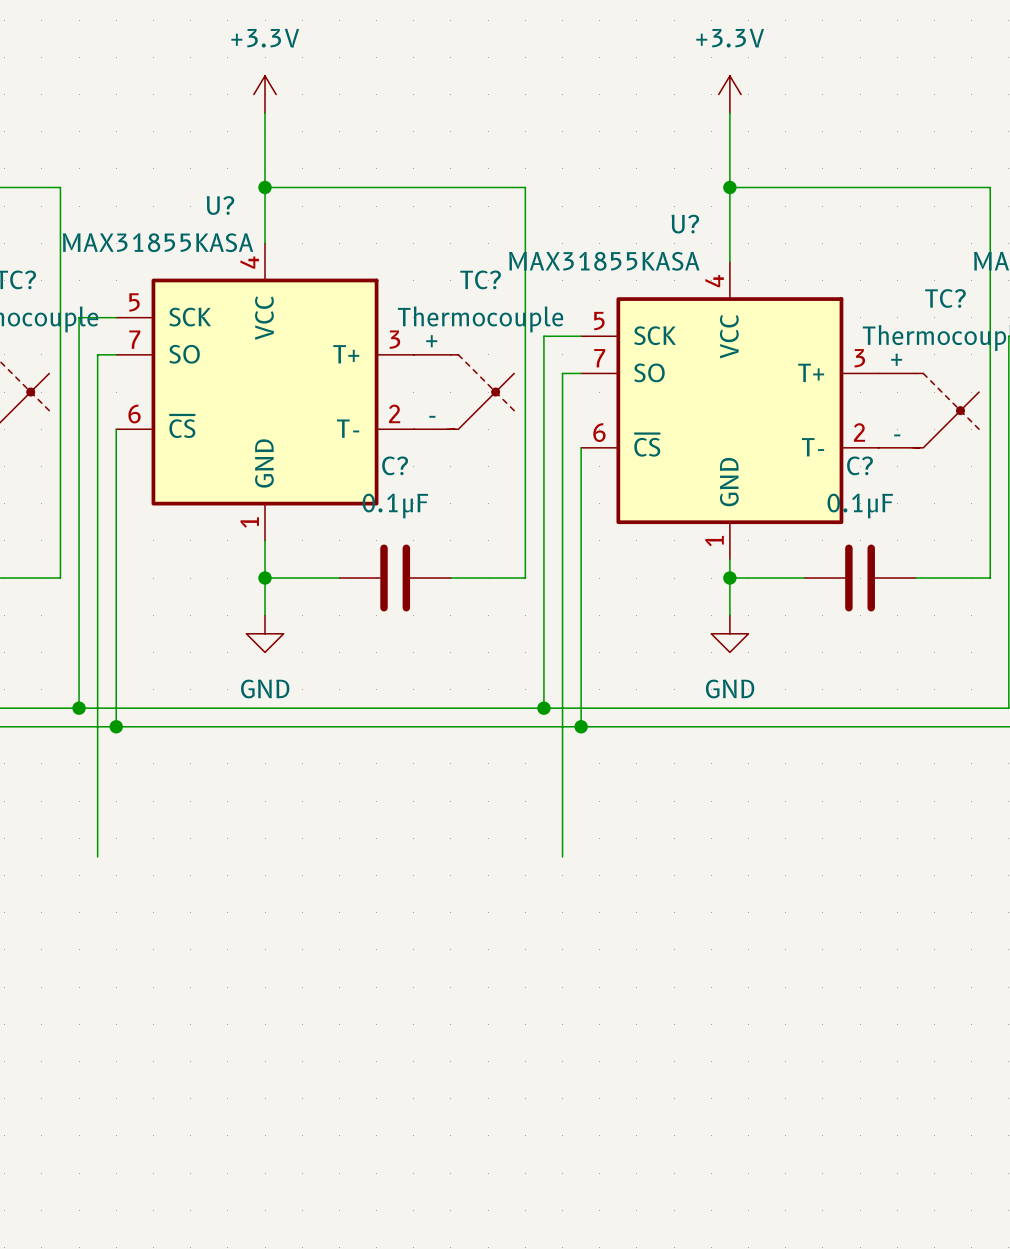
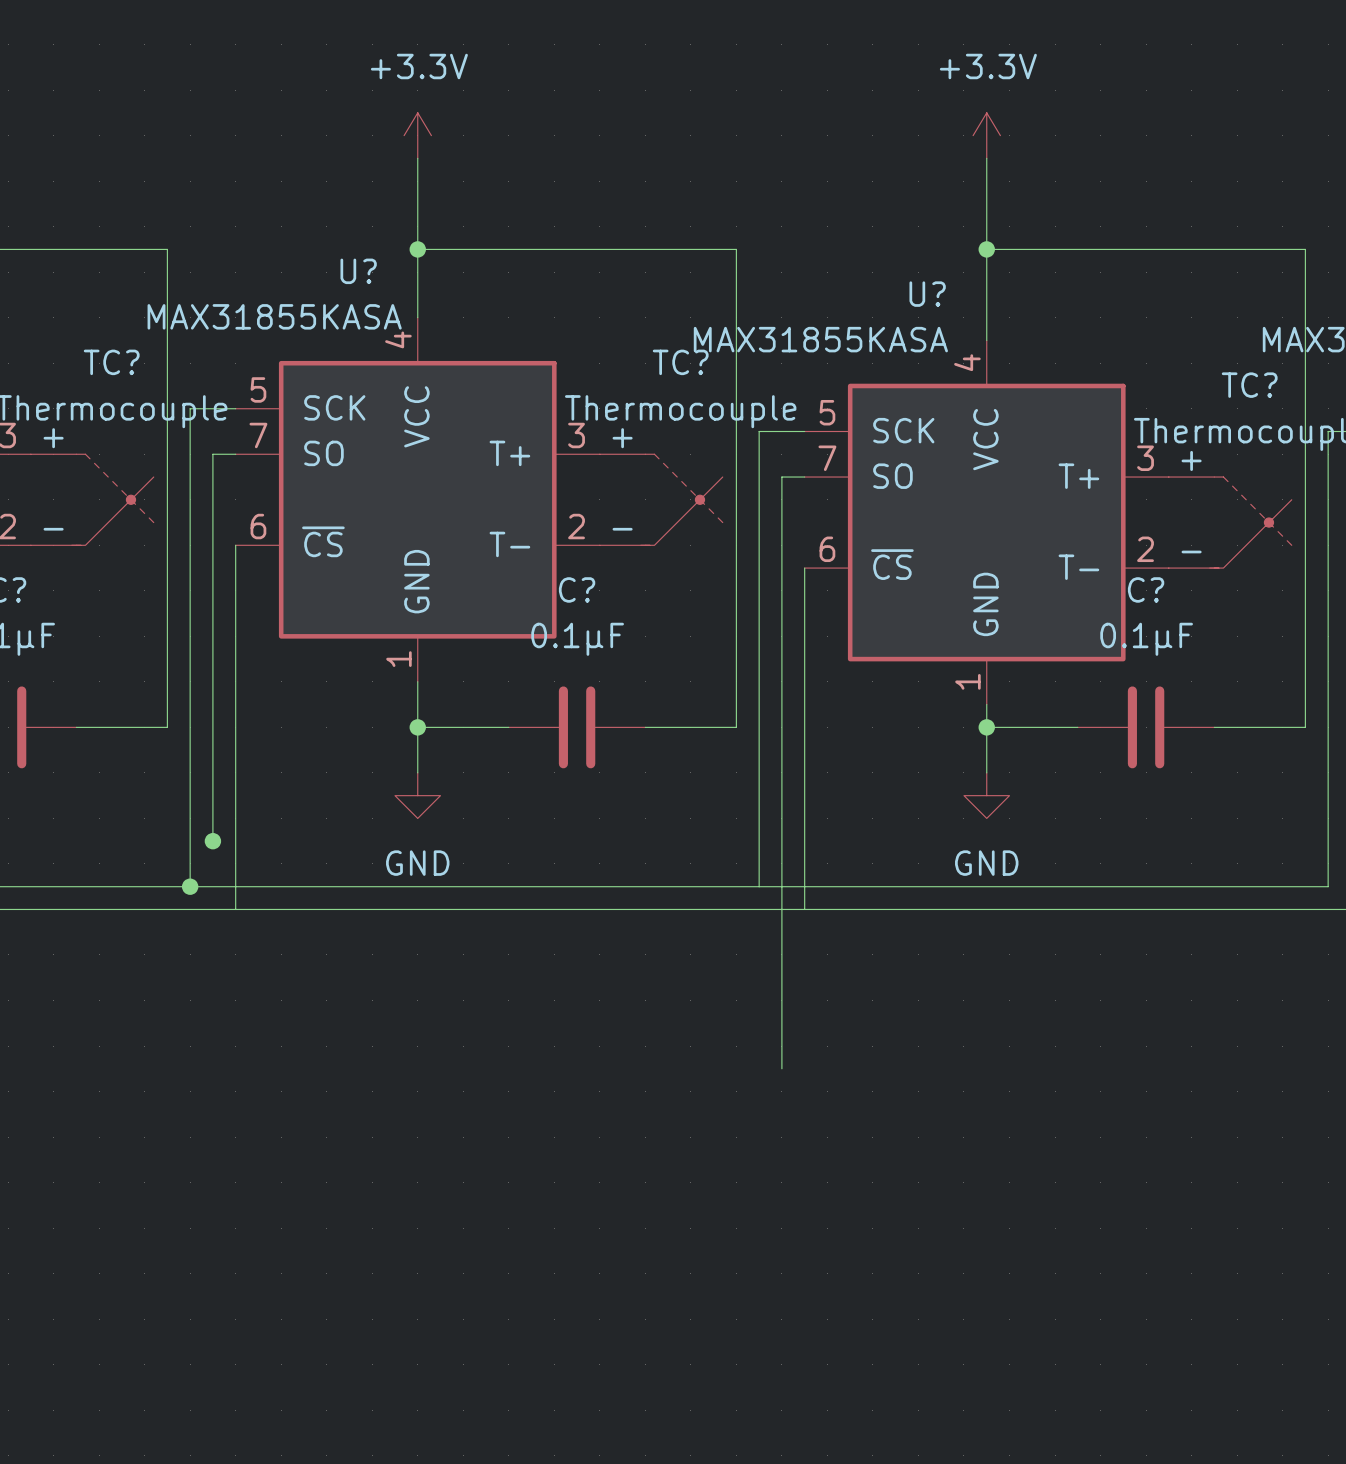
wire: (97, 670) (97, 856) -> none
junction: (543, 708) -> none
junction position: (116, 726) -> (212, 841)
junction: (581, 726) -> none

